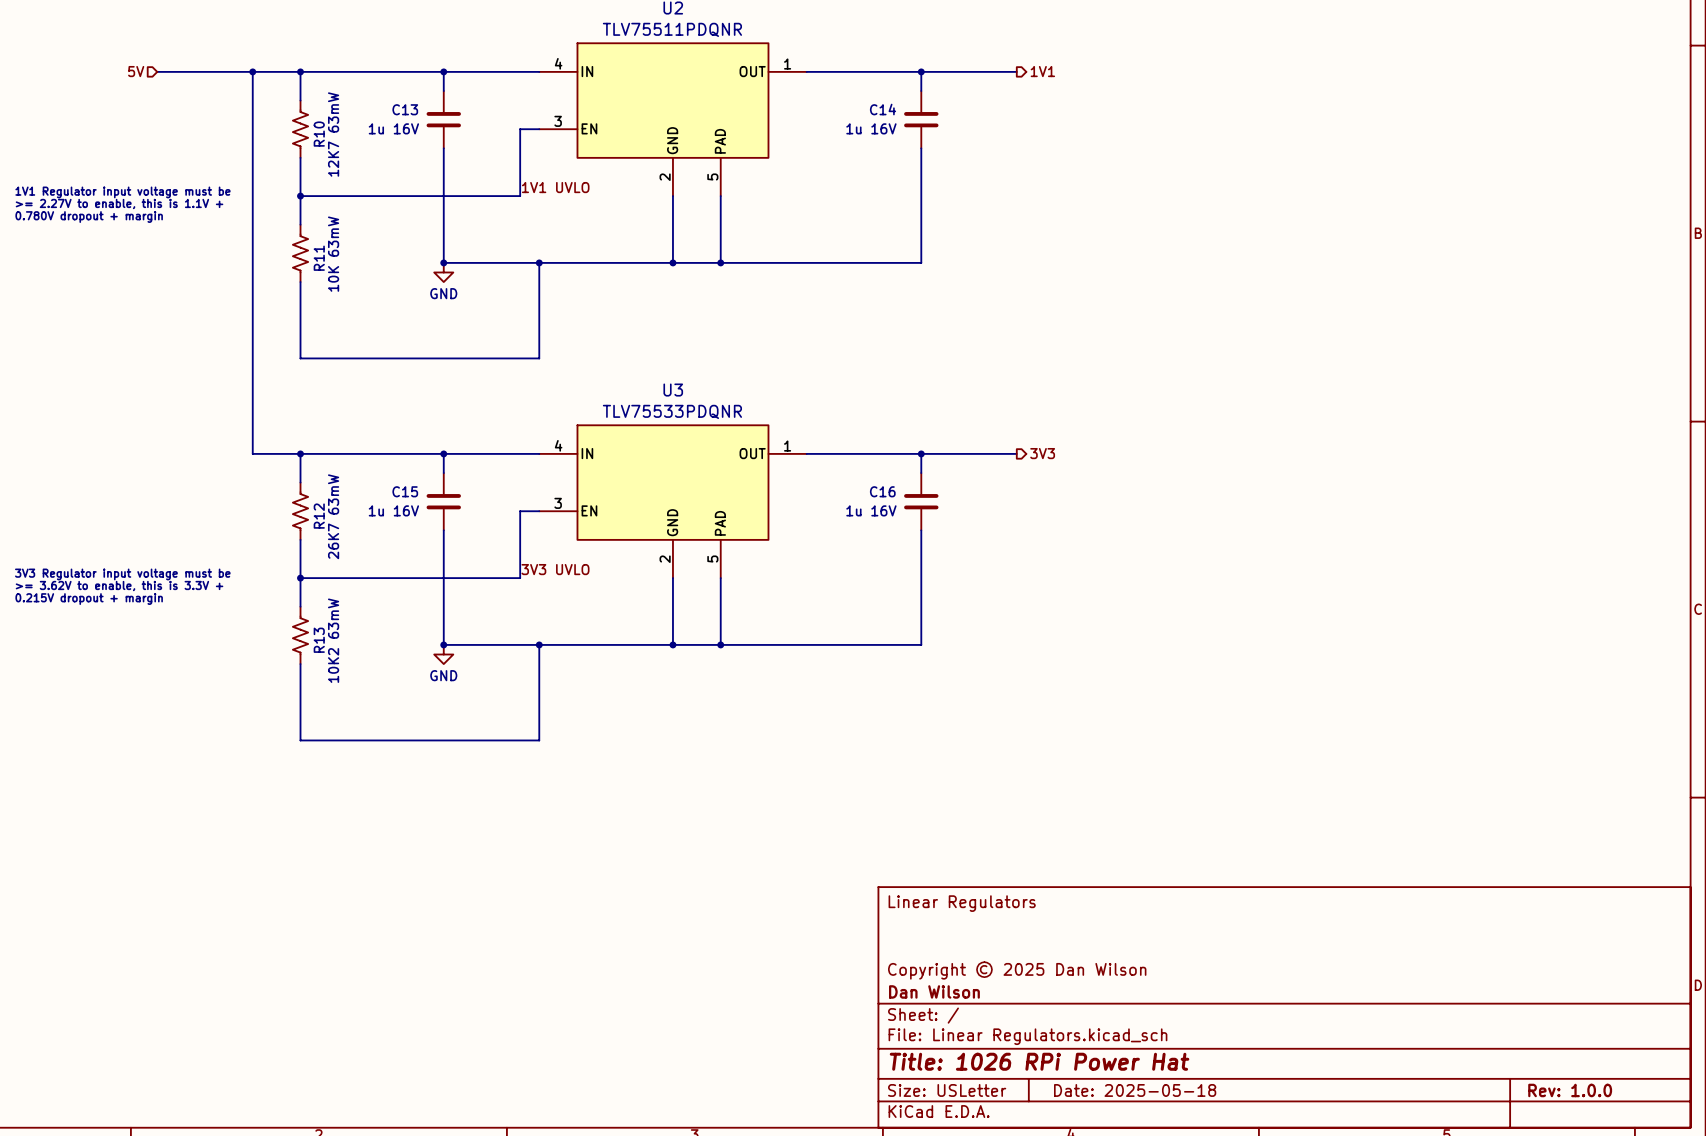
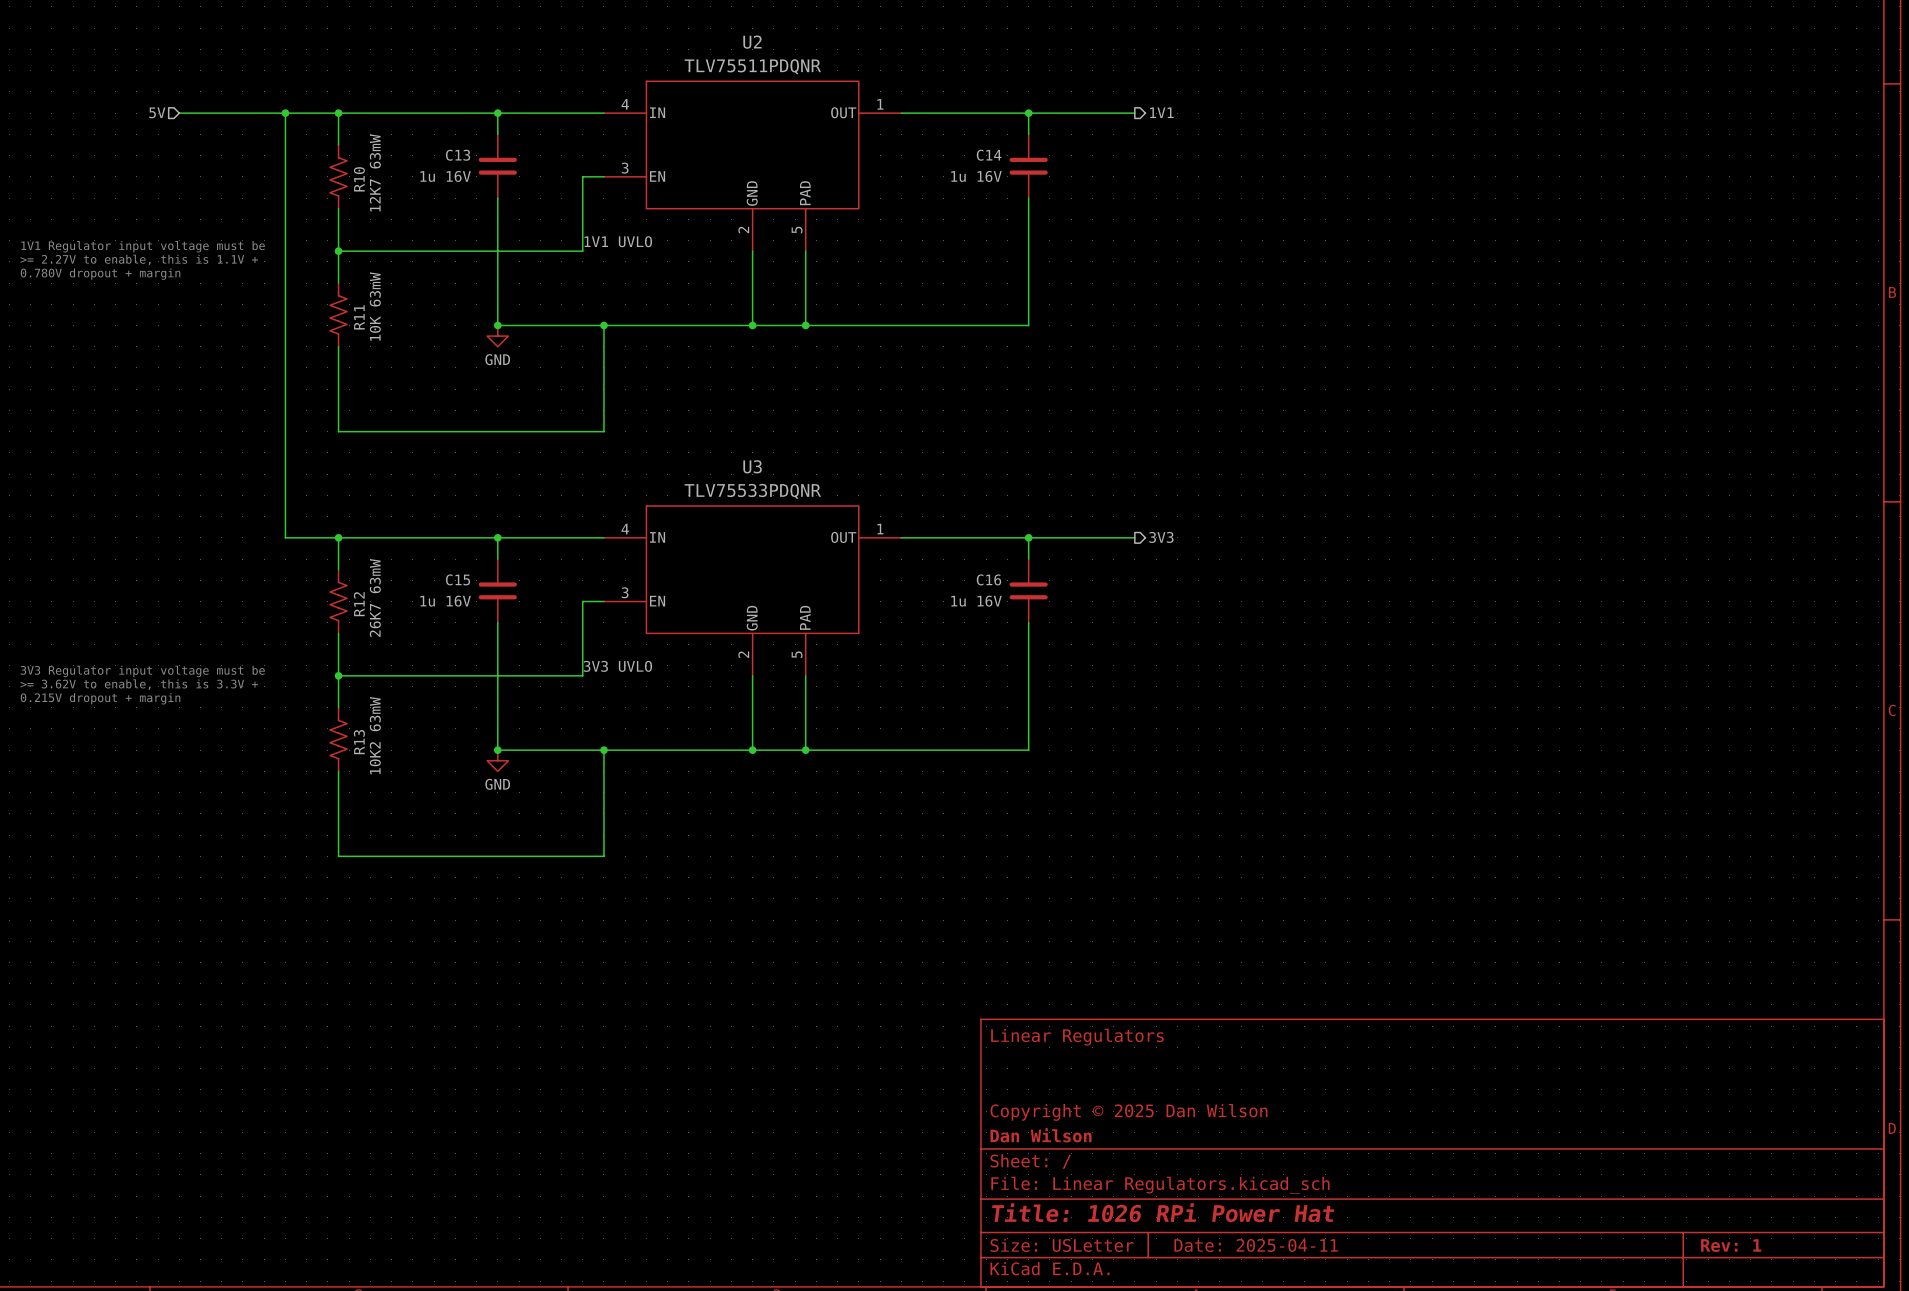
title block: Date: 2025-05-18 (1135, 1090) -> Date: 2025-04-11 (1256, 1245)
title block: Rev: 1.0.0 (1570, 1090) -> Rev: 1 (1731, 1245)

